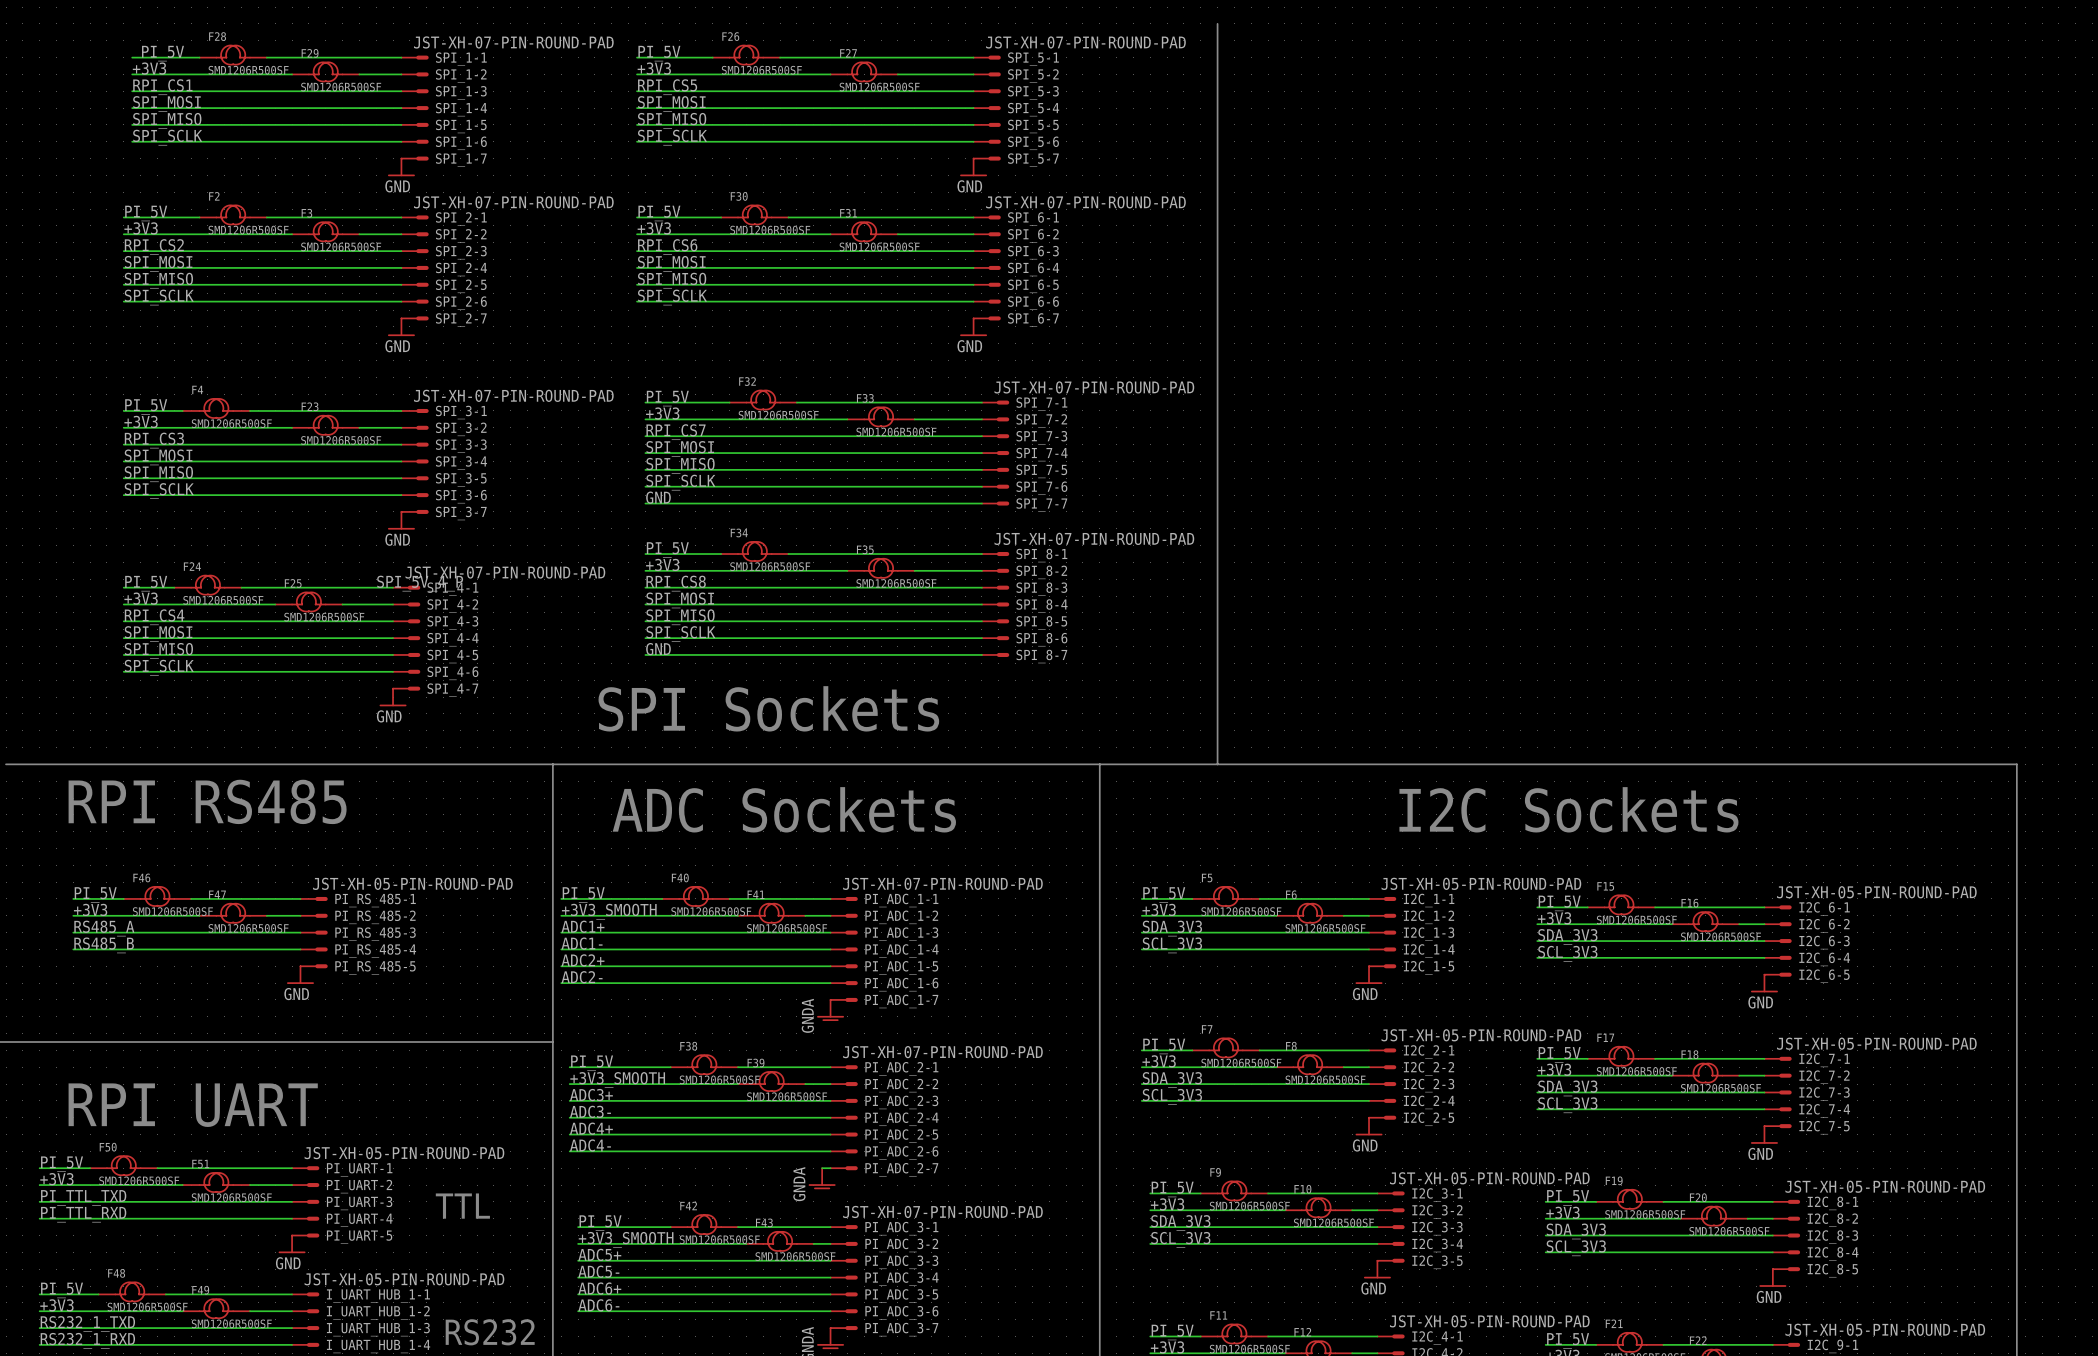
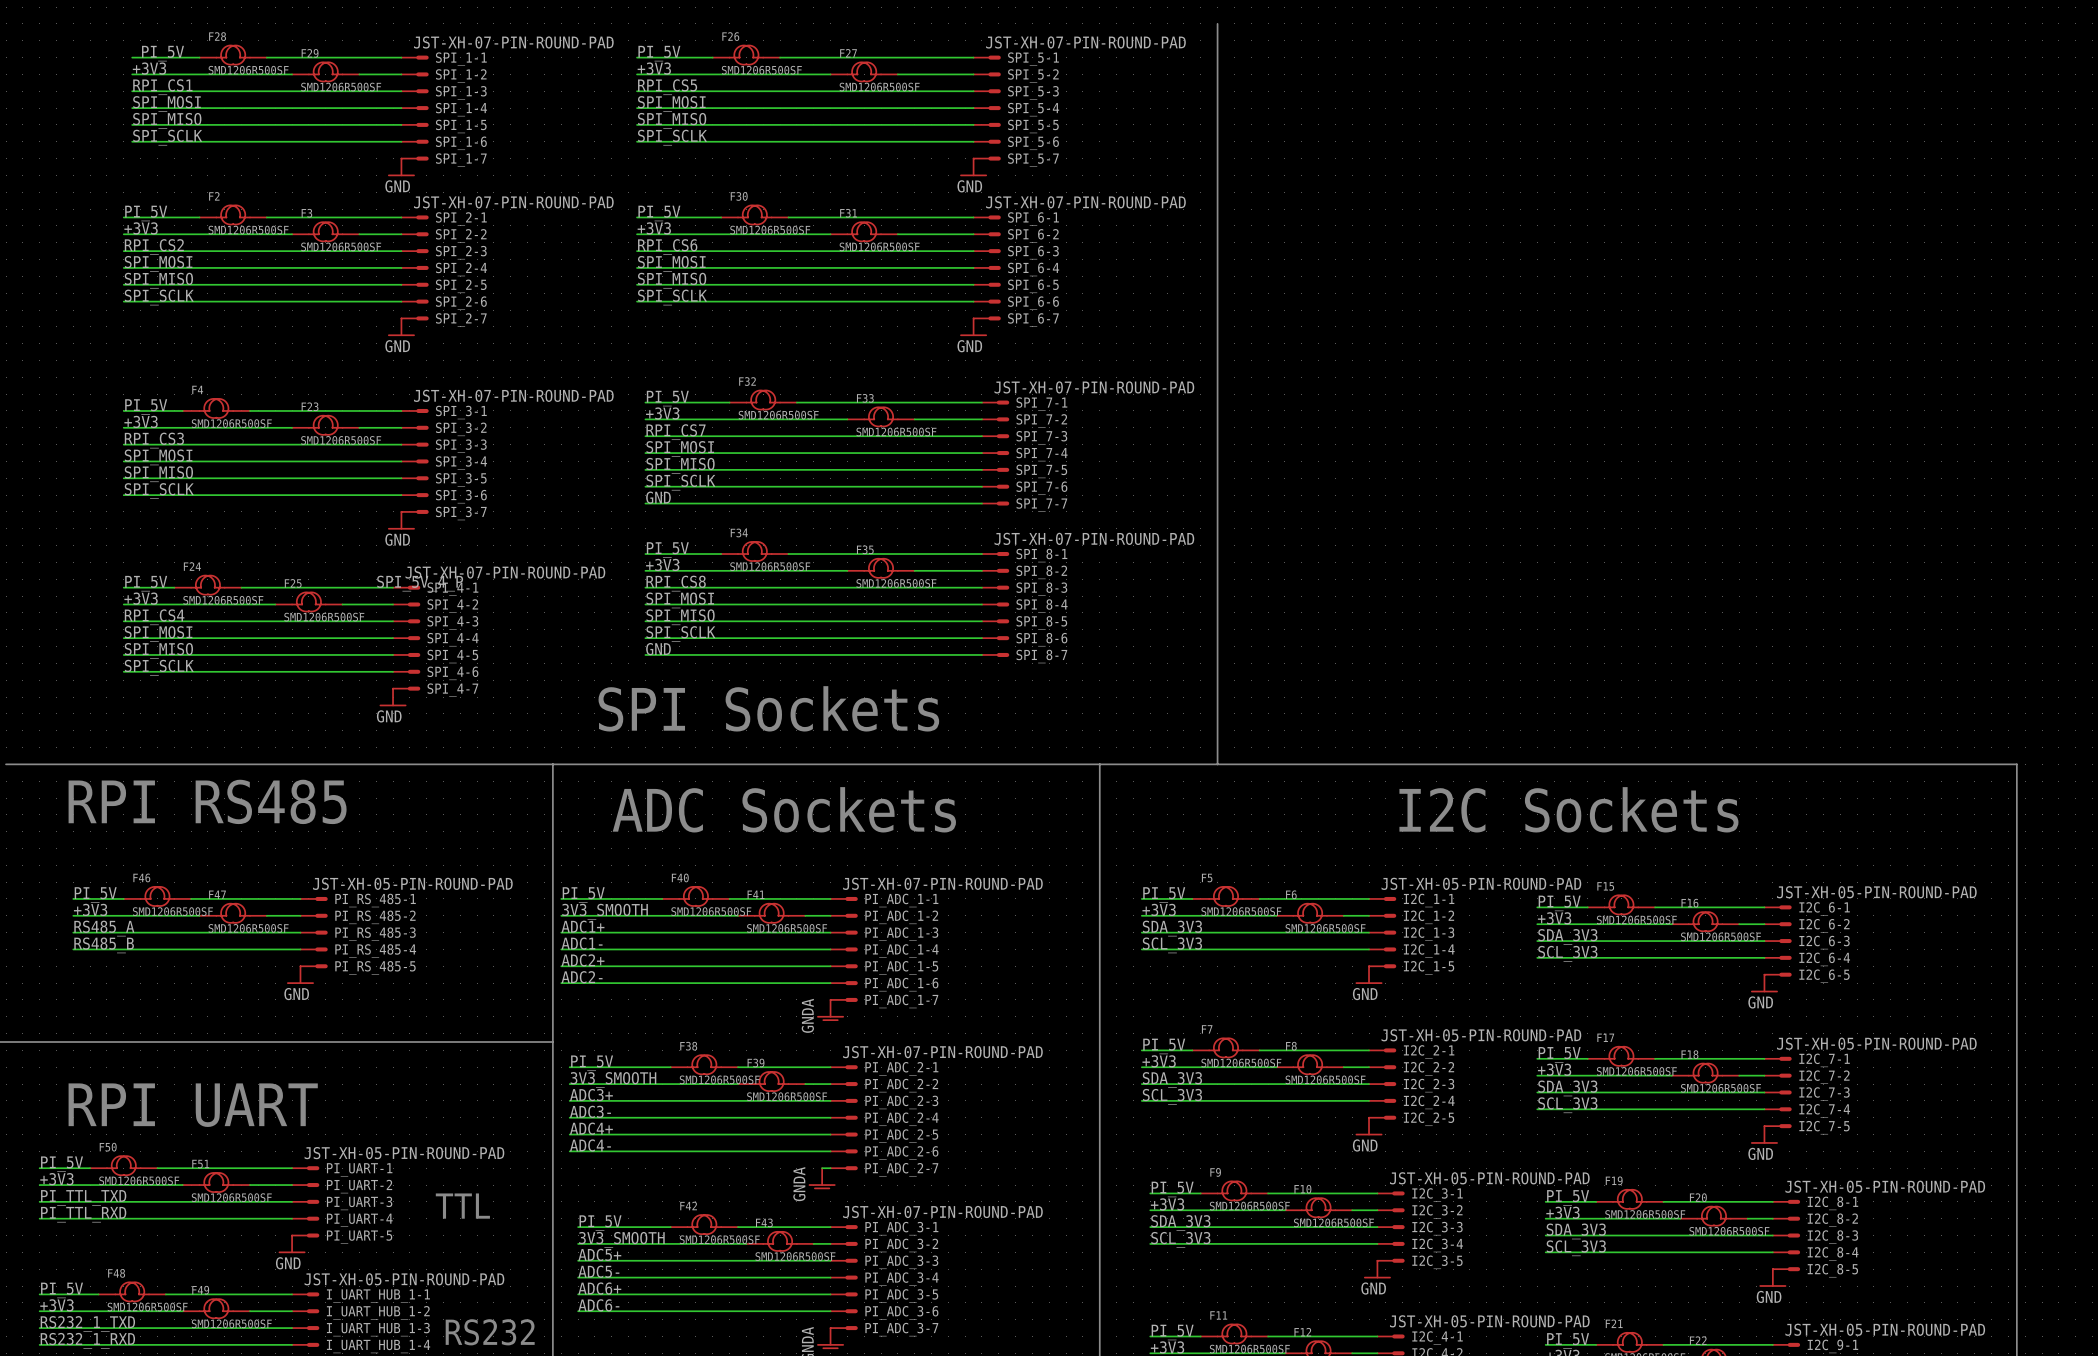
label: +3V3_SMOOTH (609, 911) -> 3V3_SMOOTH (605, 911)
label: +3V3_SMOOTH (617, 1079) -> 3V3_SMOOTH (613, 1079)
label: +3V3_SMOOTH (626, 1239) -> 3V3_SMOOTH (621, 1239)

